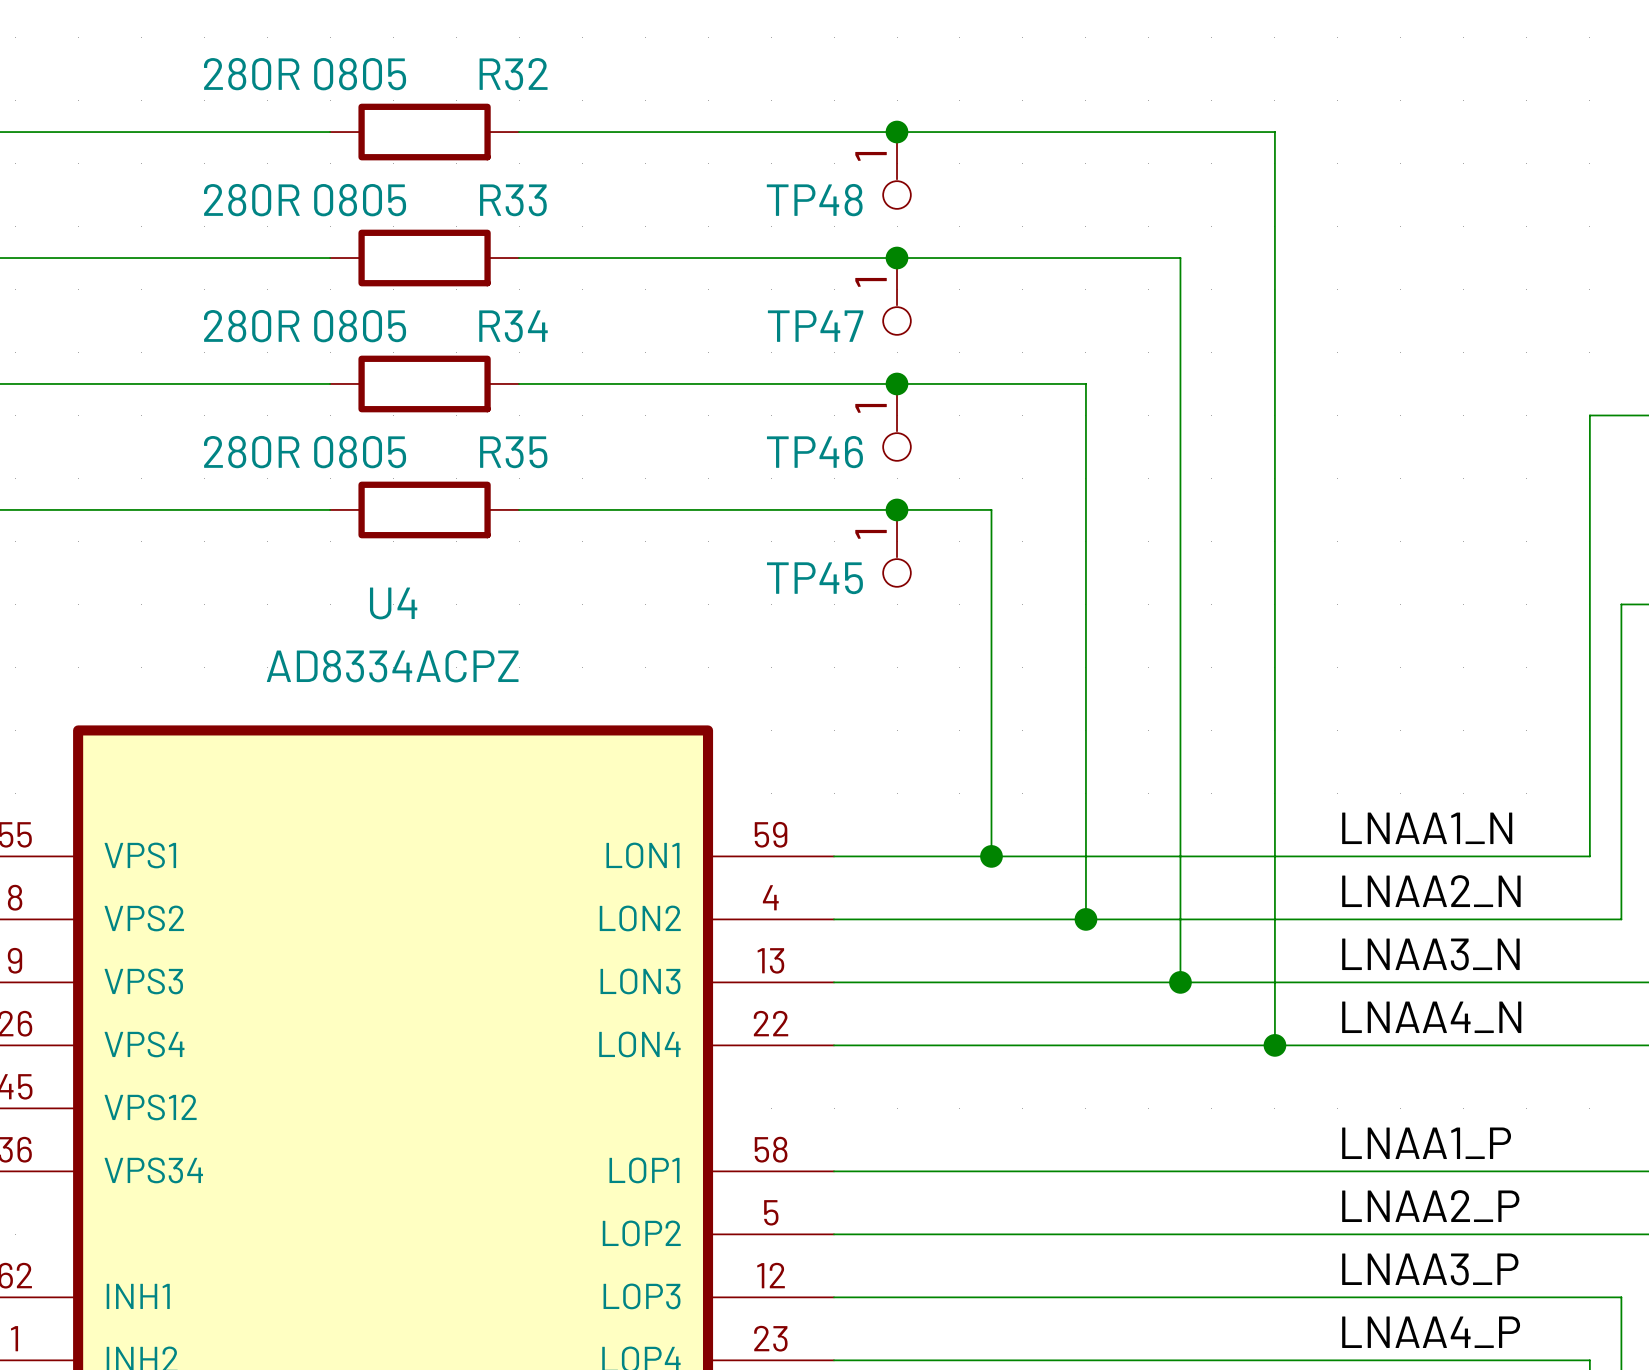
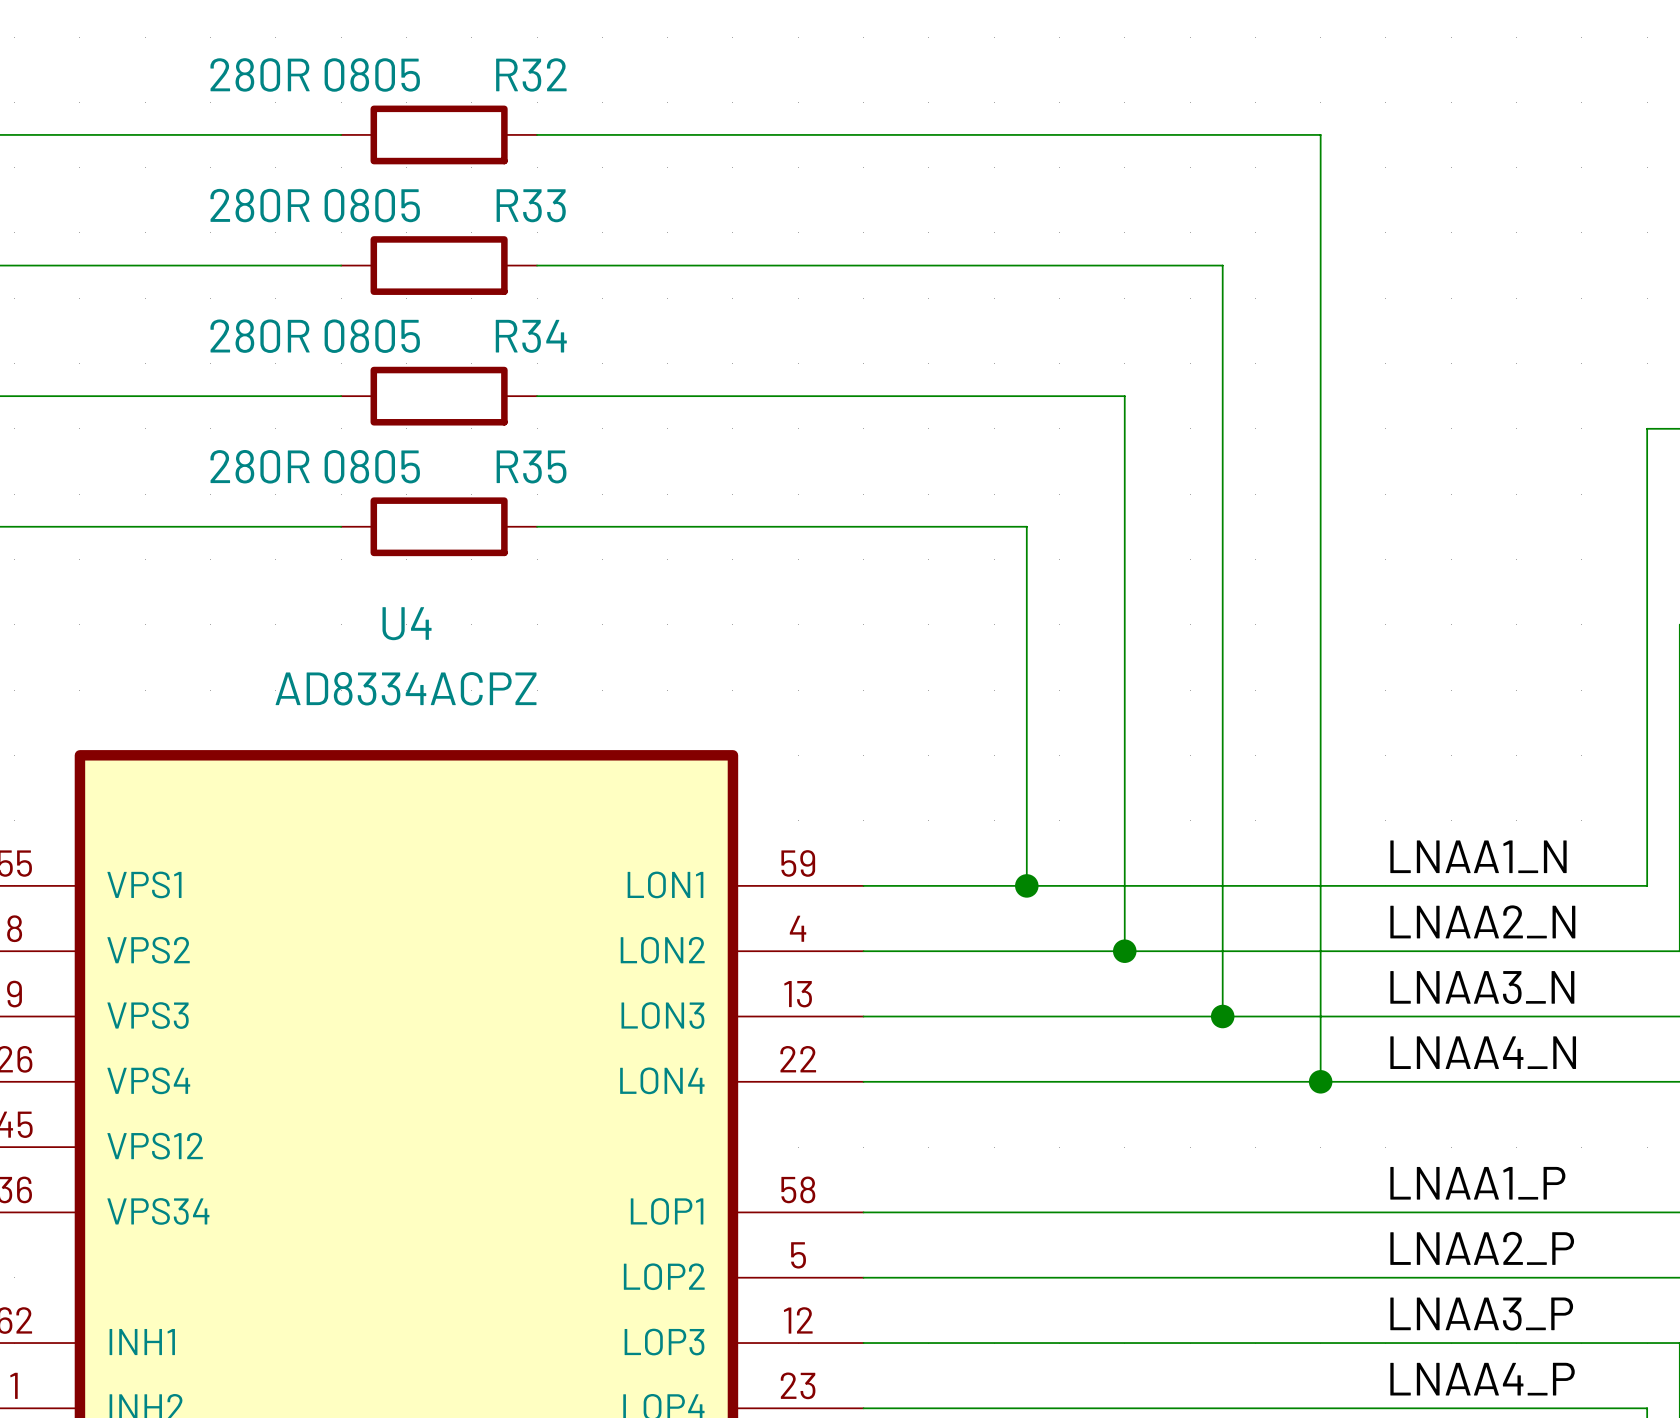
junction: (897, 132) -> none
TP48: (897, 170) -> none
junction: (897, 258) -> none
TP47: (897, 296) -> none
junction: (897, 383) -> none
TP46: (897, 422) -> none
junction: (897, 509) -> none
TP45: (897, 548) -> none

